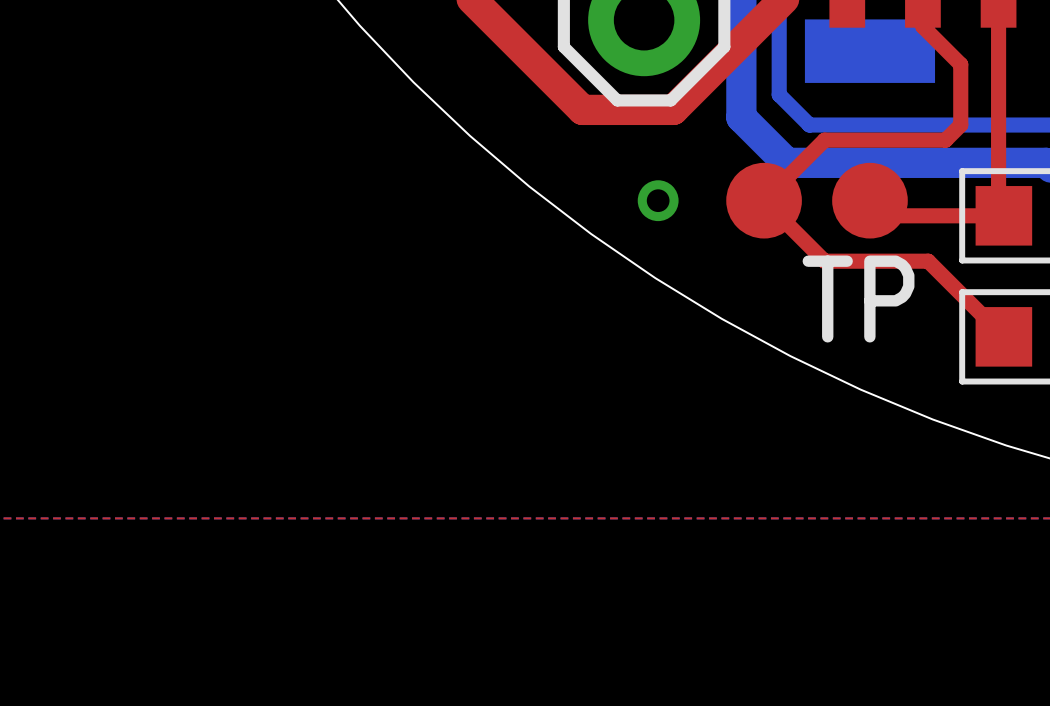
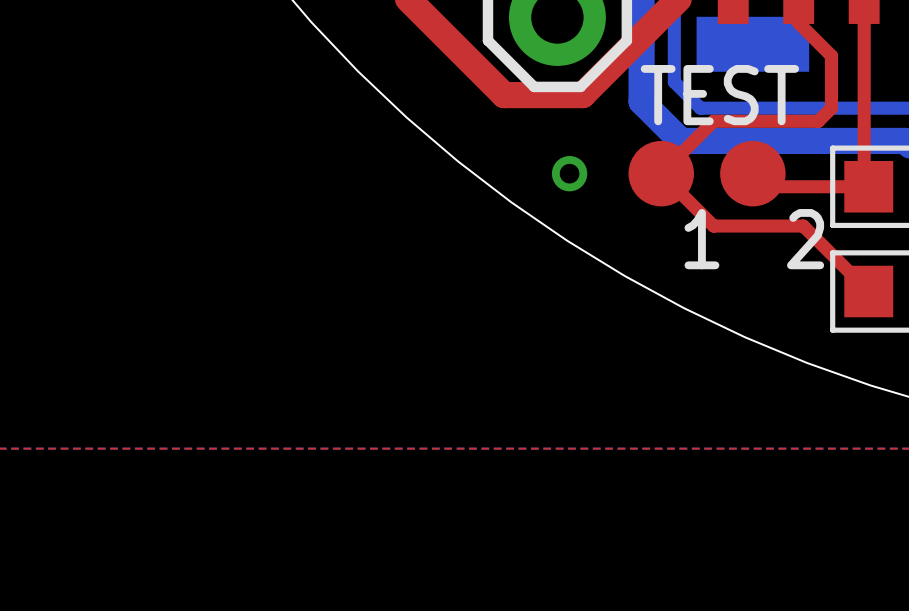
text: none -> TEST (719, 95)
text: none -> 2 (805, 239)
text: TP (858, 299) -> 1 (701, 239)

